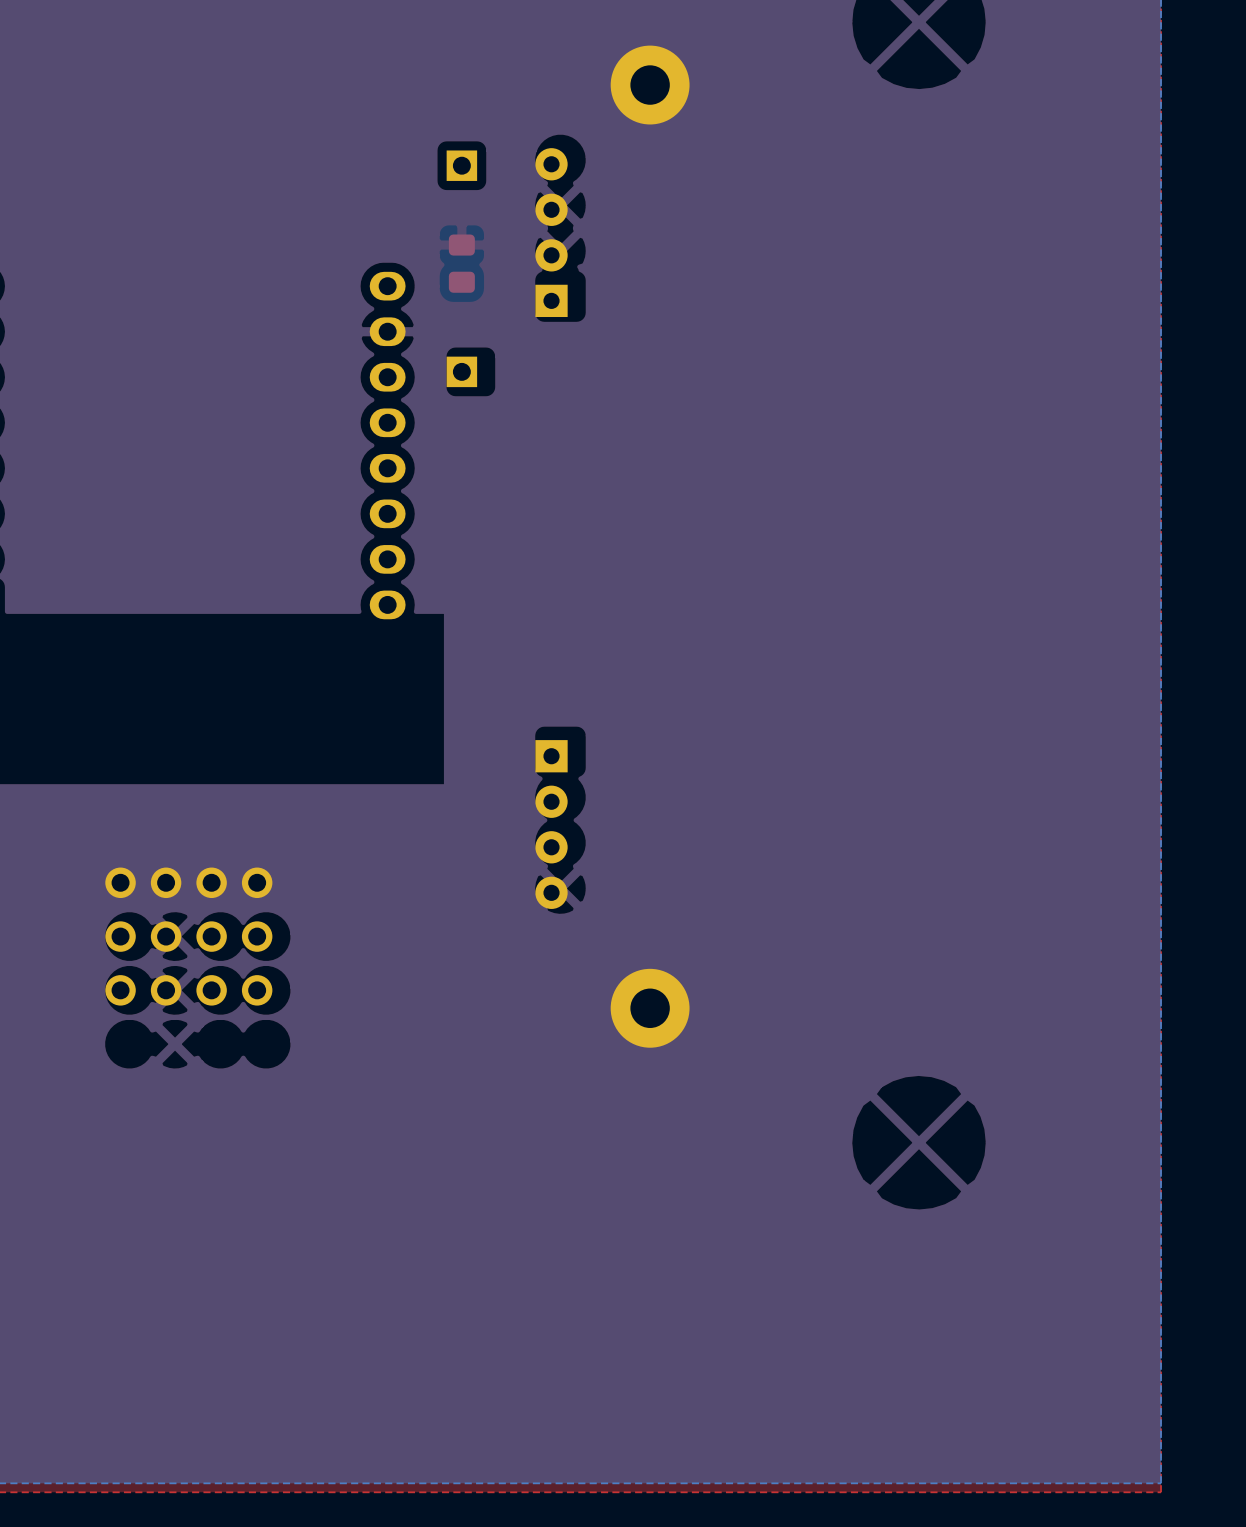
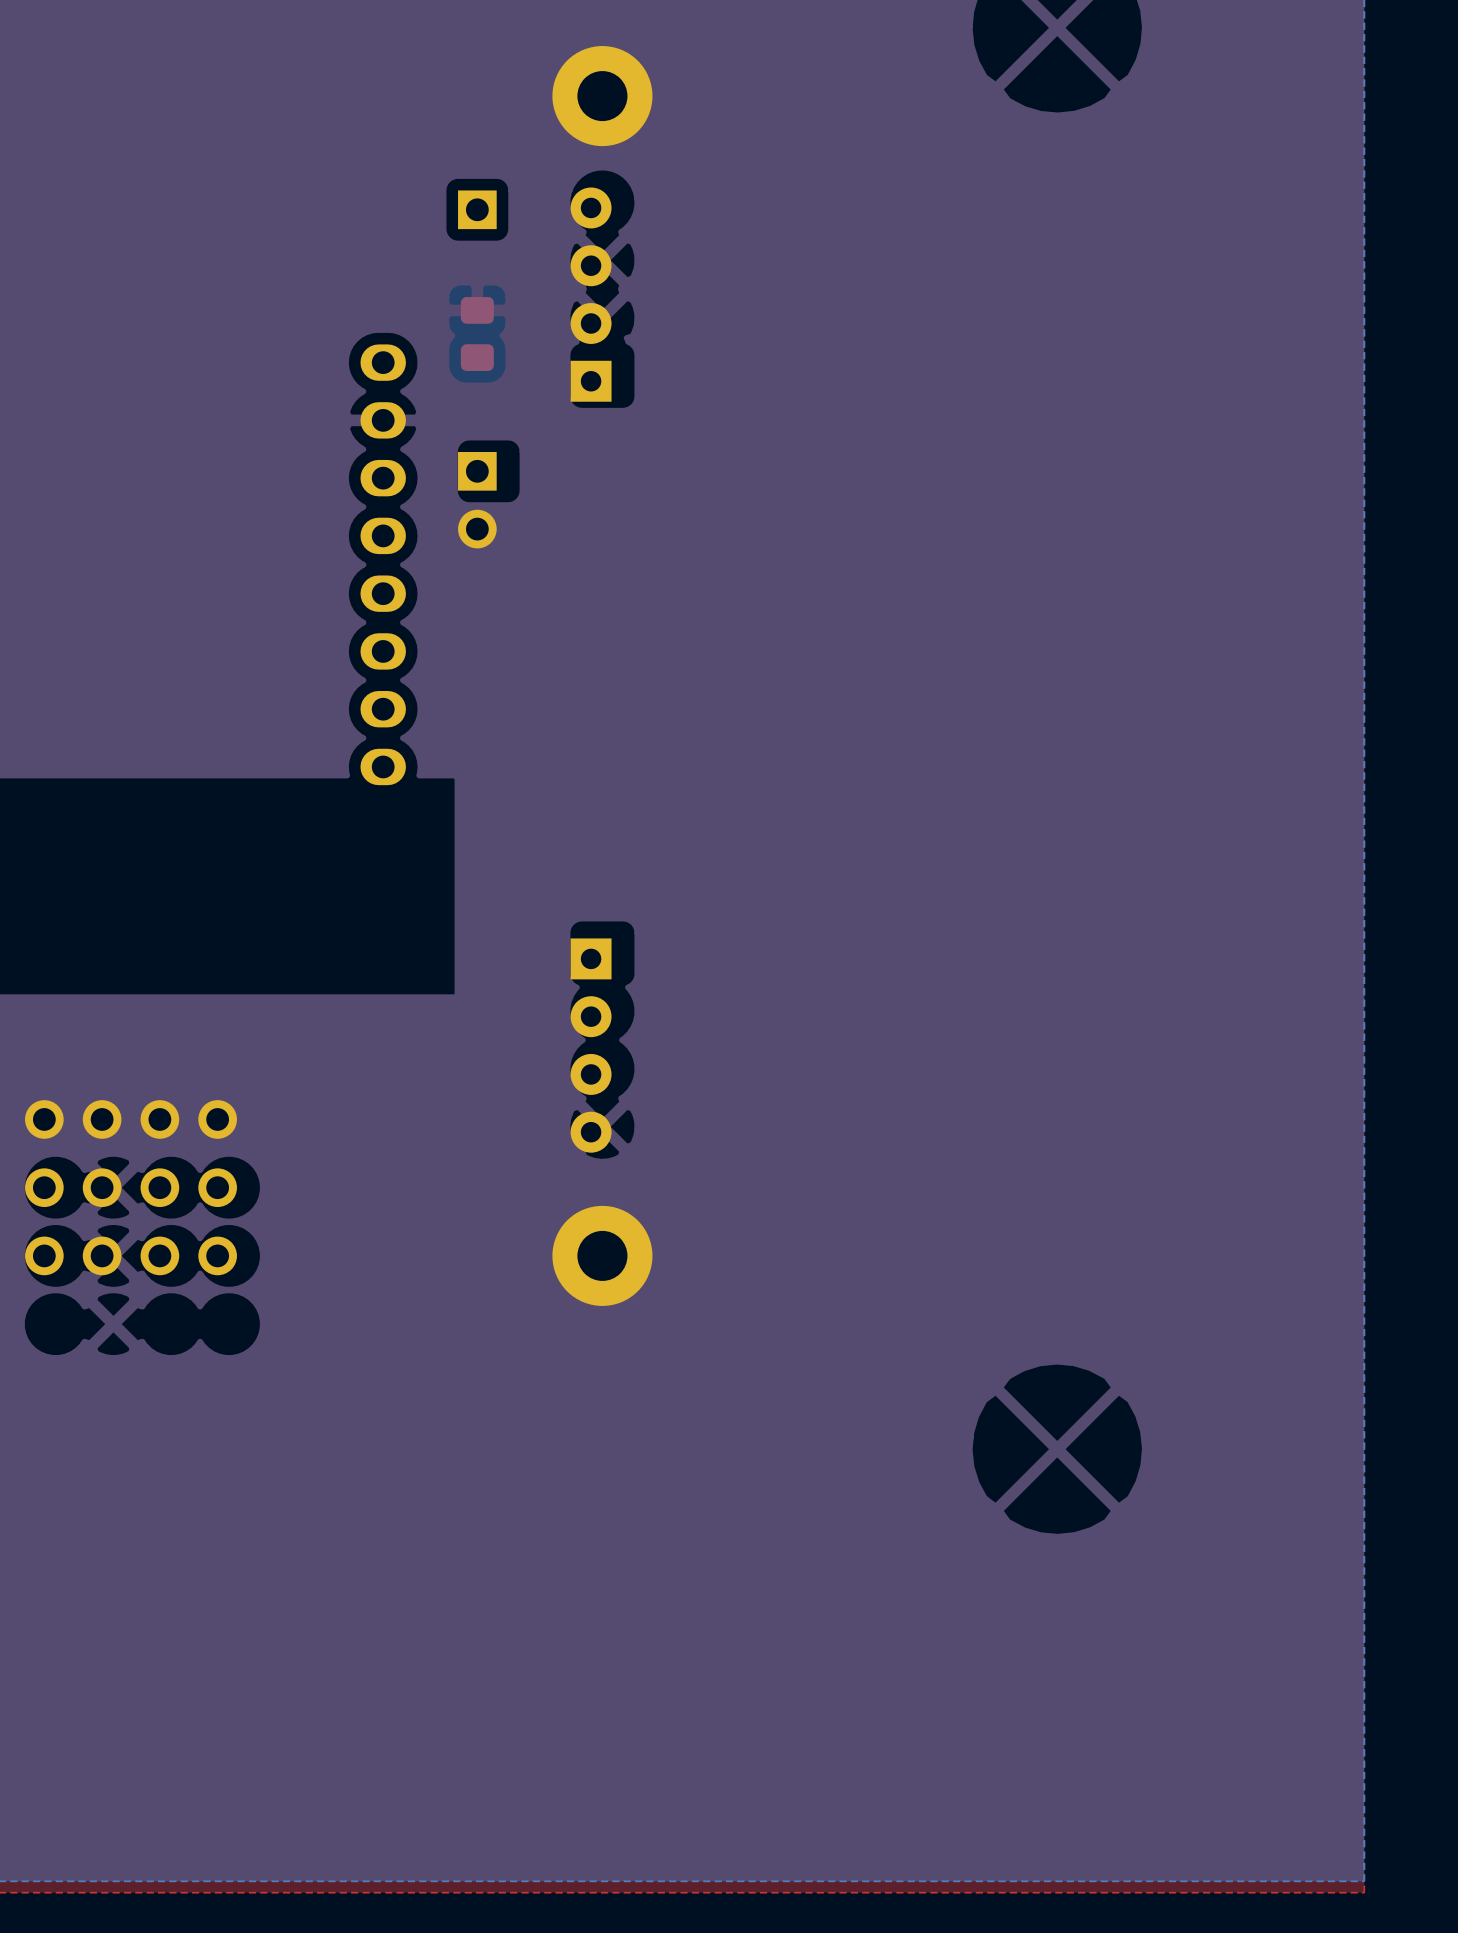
part position: (650, 85) -> (602, 96)
part: none -> (477, 500)
part position: (650, 1008) -> (602, 1255)

